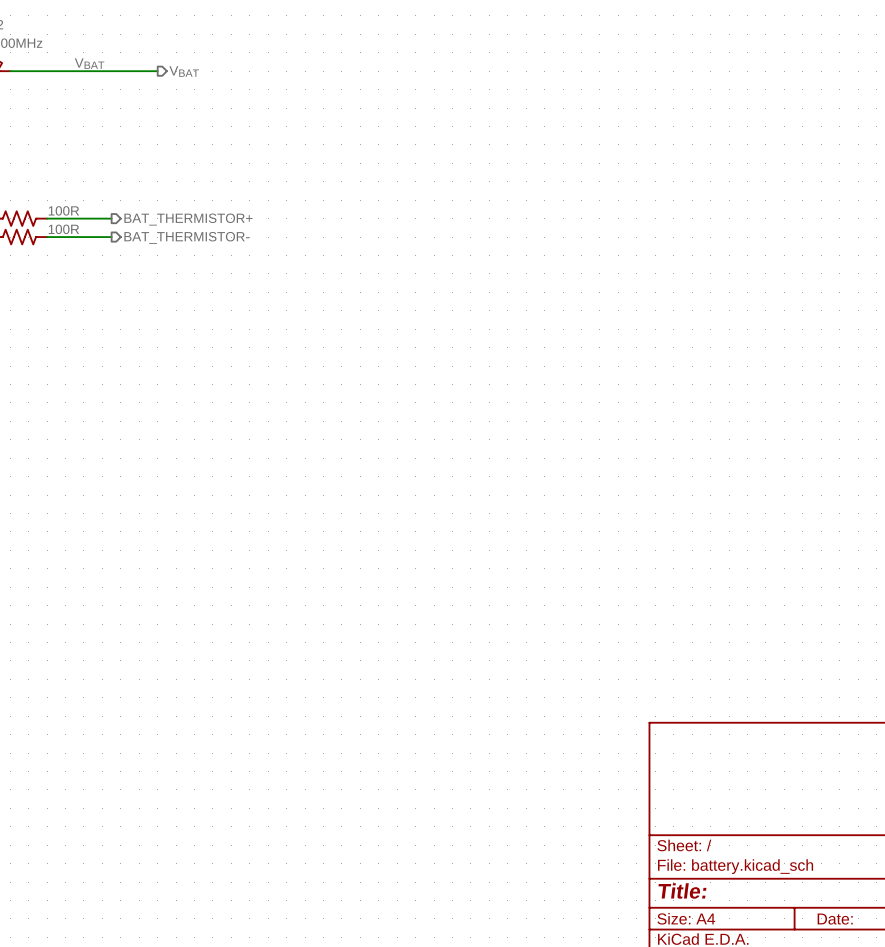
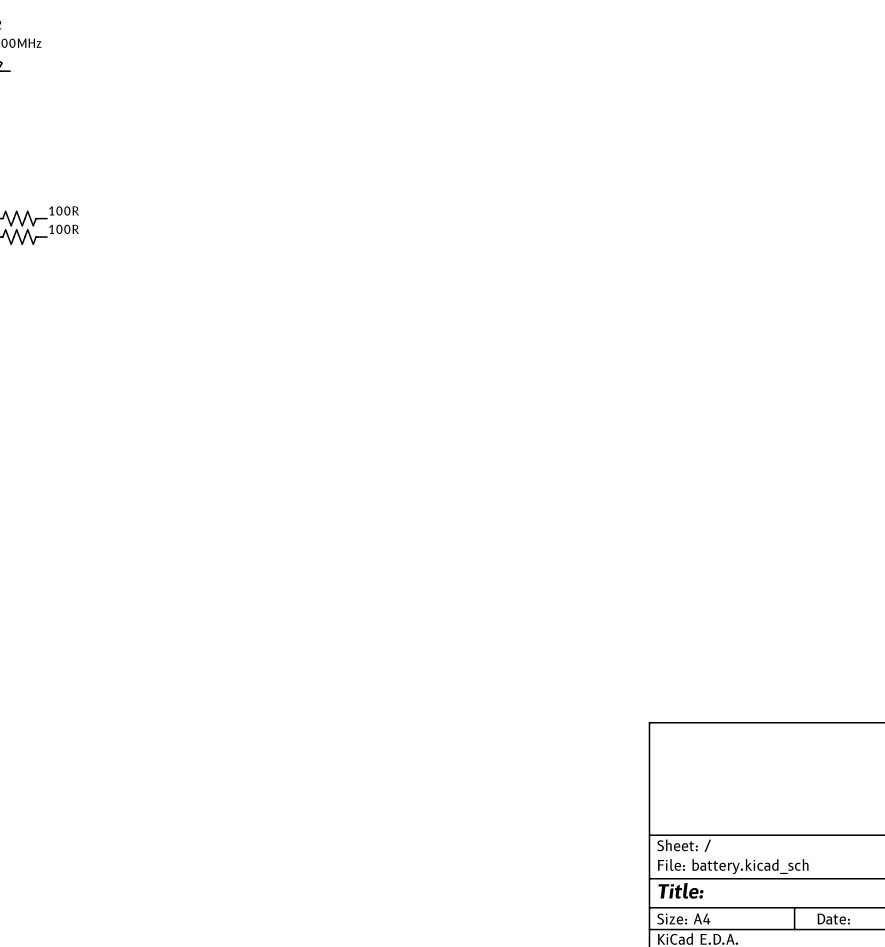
label: VBAT (89, 63) -> none
wire: (10, 71) (157, 71) -> none
hierarchical label: VBAT (184, 71) -> none
wire: (47, 218) (111, 218) -> none
hierarchical label: BAT_THERMISTOR+ (188, 219) -> none
wire: (47, 237) (111, 237) -> none
hierarchical label: BAT_THERMISTOR- (186, 237) -> none

